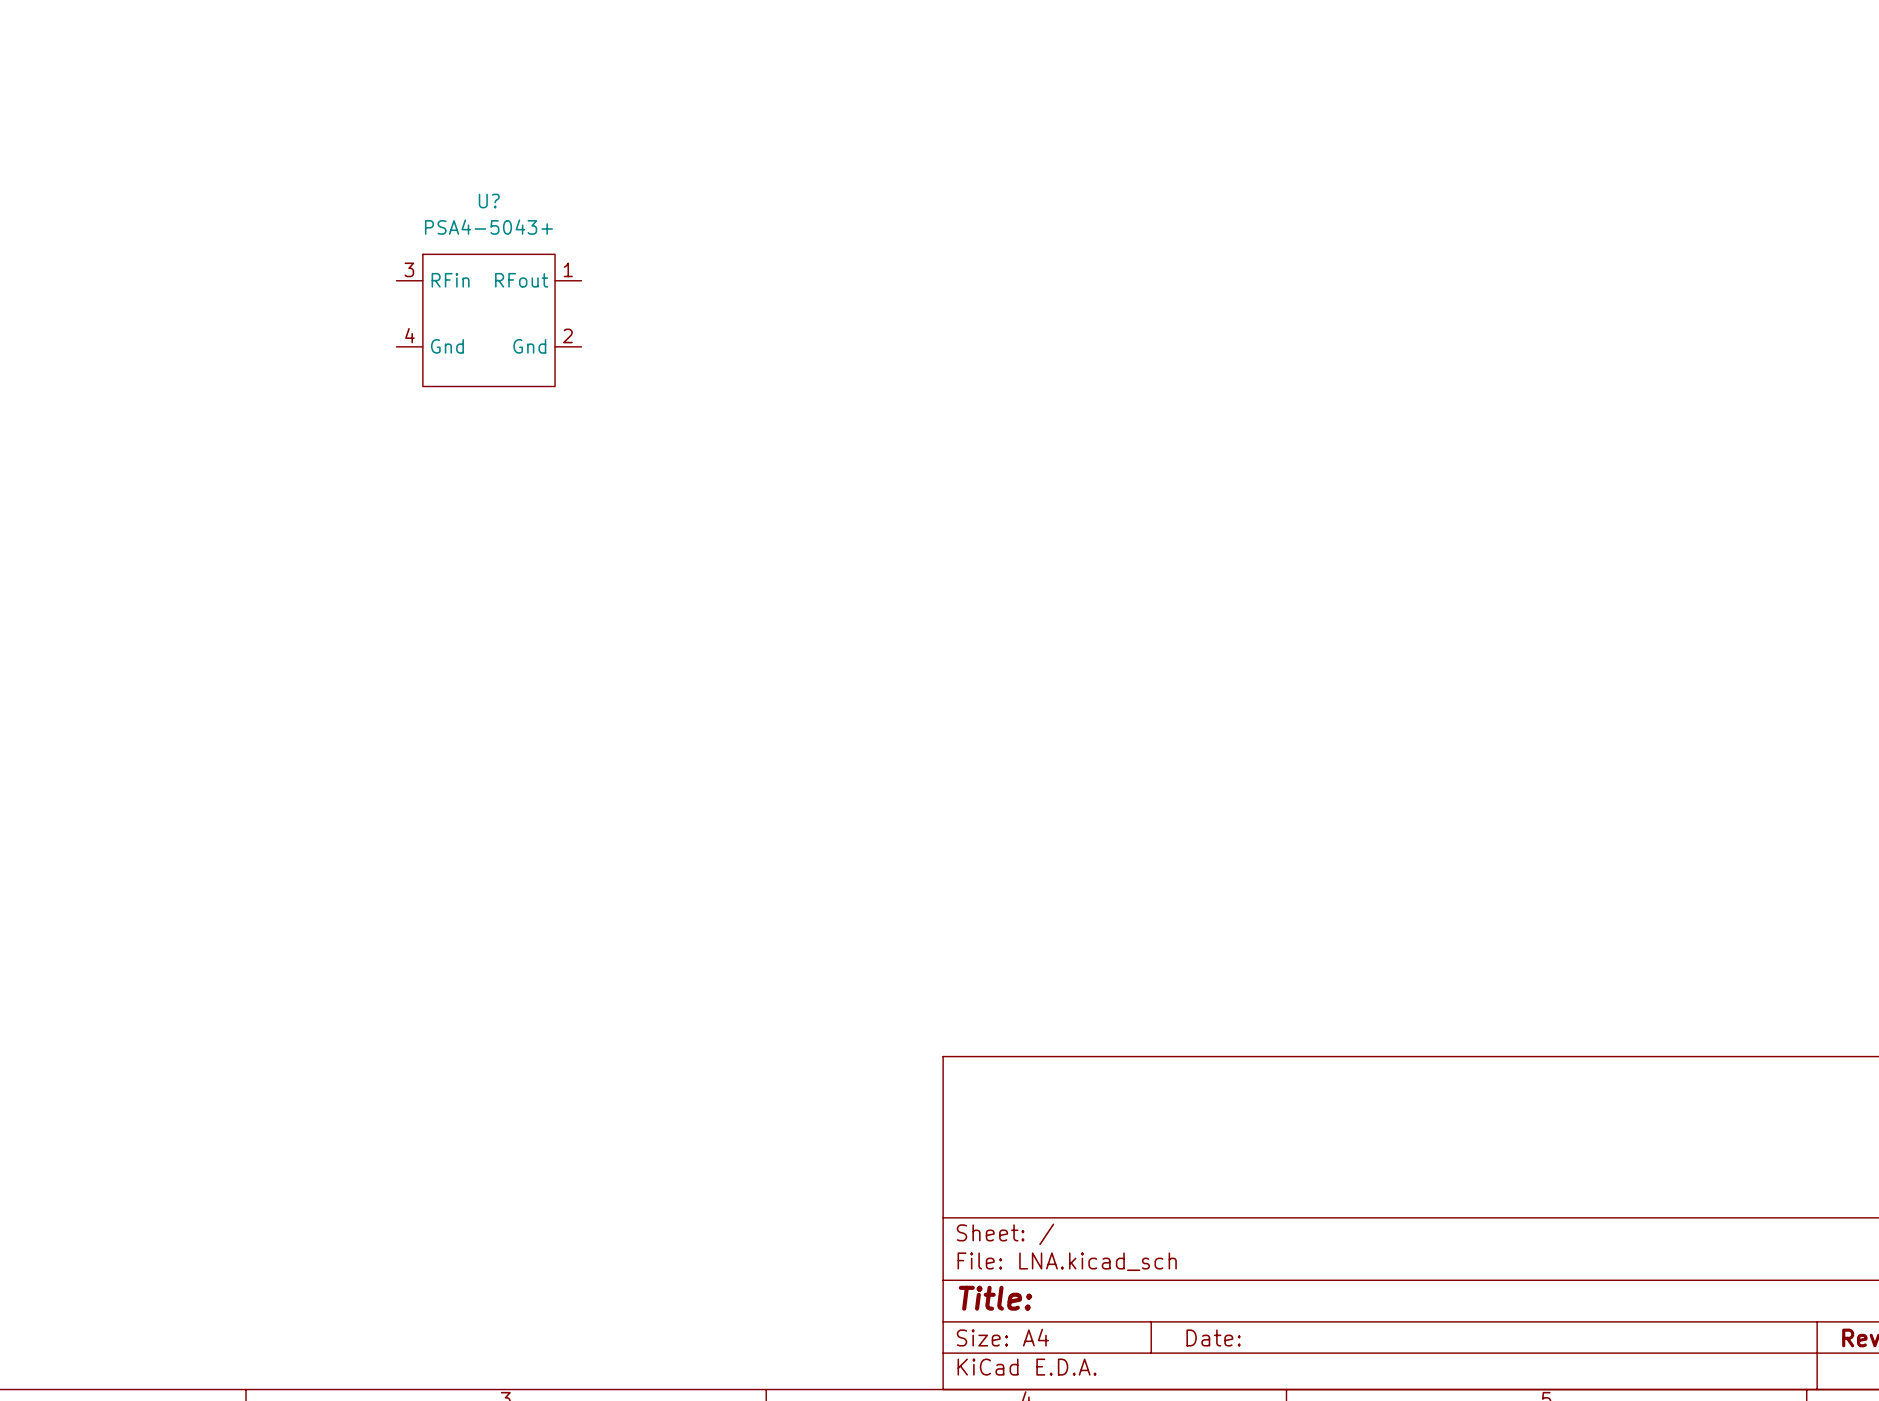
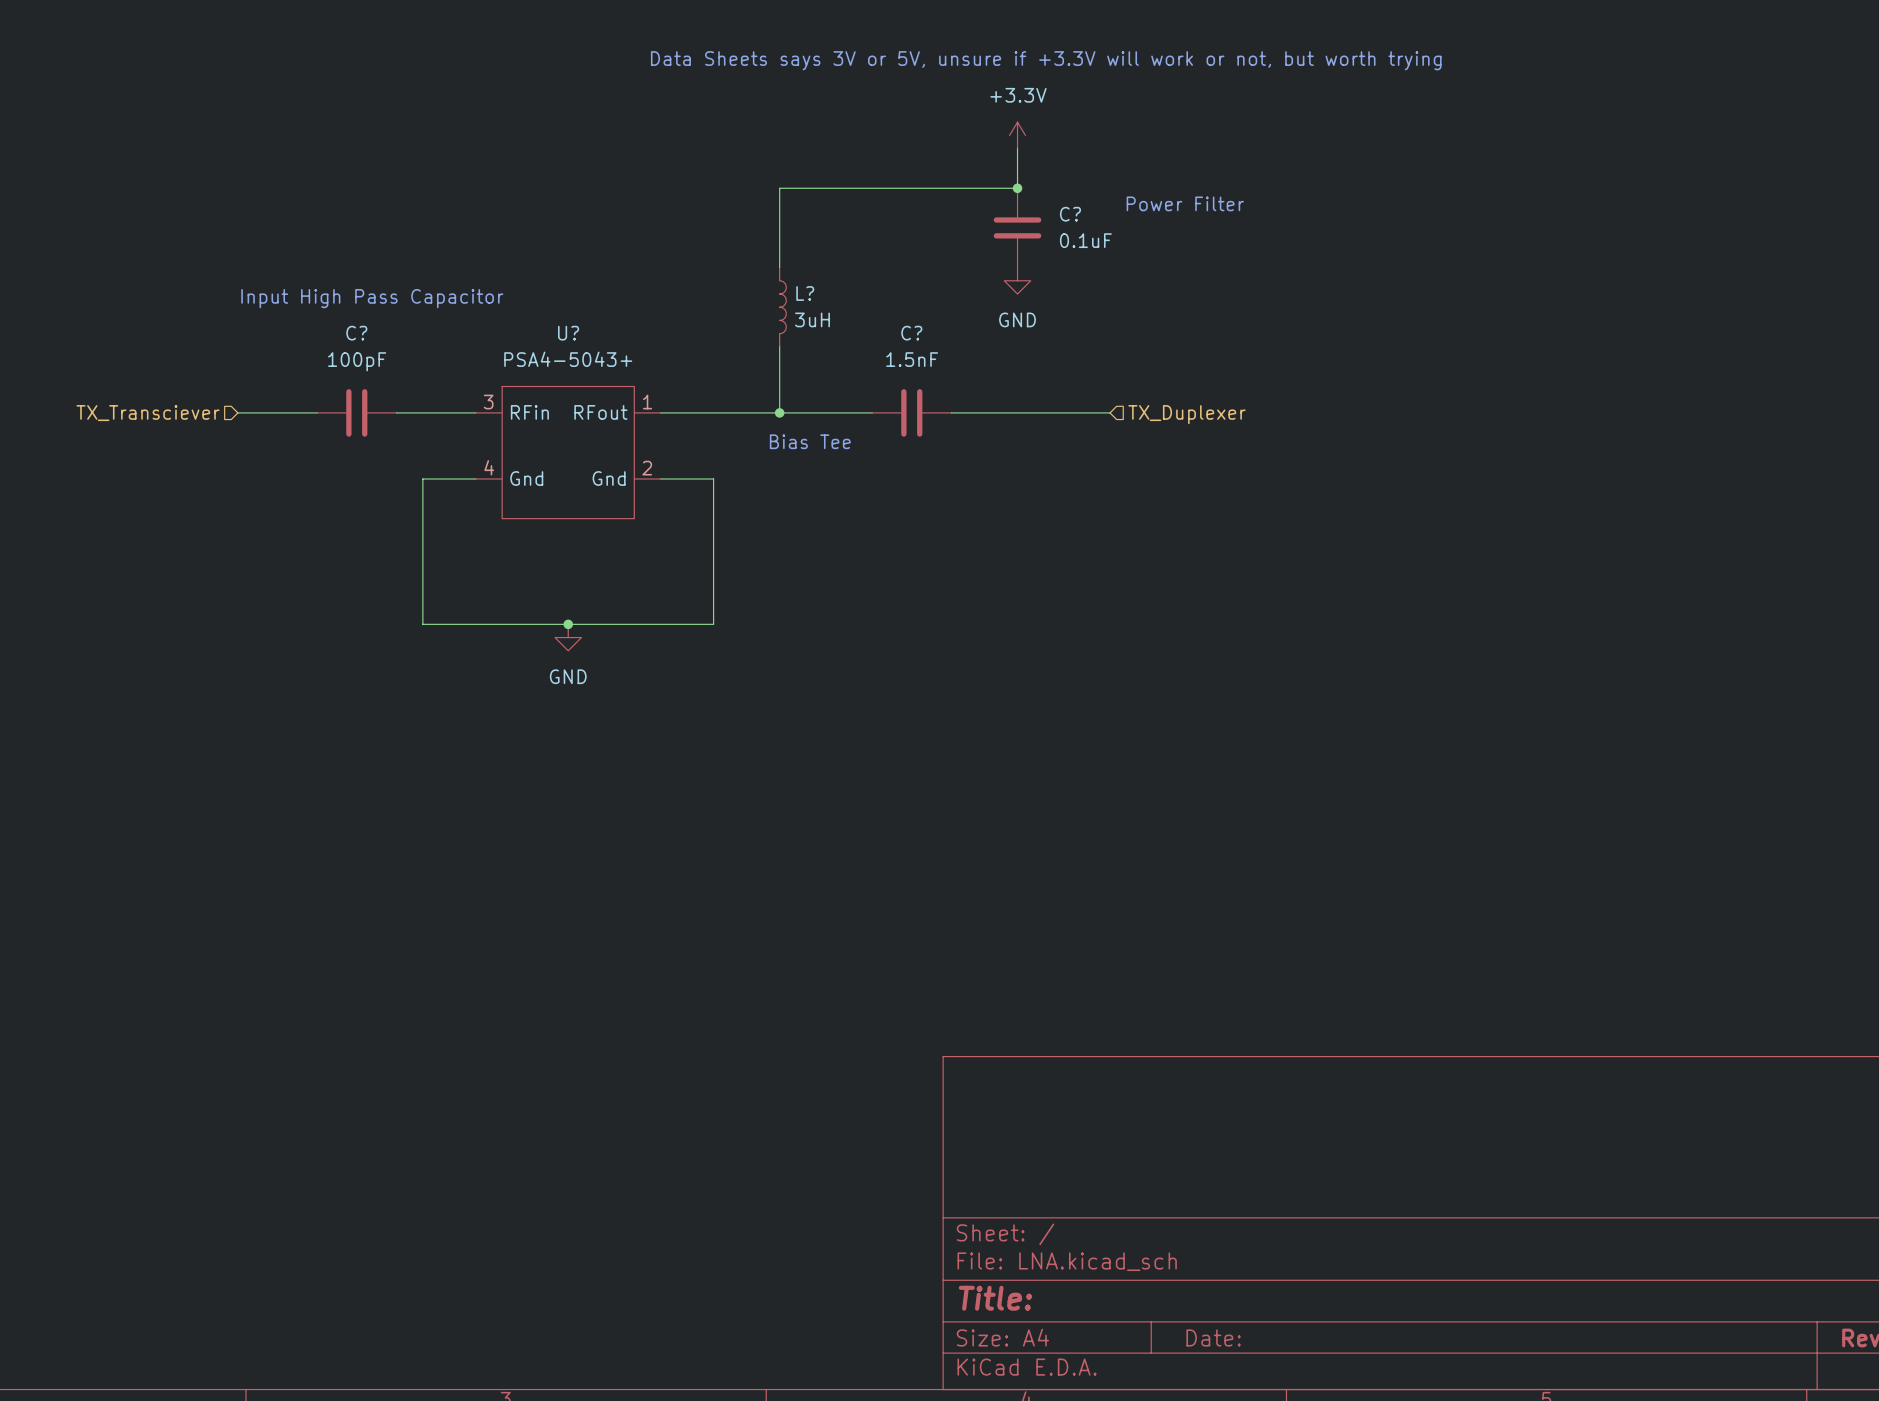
text: none -> Data Sheets says 3V or 5V, unsure if +3.3V will work or not, but worth trying (1046, 60)
power symbol: none -> +3.3V (1017, 135)
wire: none -> (1017, 148) (1017, 188) (779, 188) (779, 267)
junction: none -> (1017, 188)
text: none -> Power Filter (1185, 203)
C?: none -> 0.1uF (1017, 227)
power symbol: none -> GND (1017, 280)
text: none -> Input High Pass Capacitor (372, 298)
L?: none -> 3uH (782, 307)
U? position: (488, 320) -> (568, 452)
wire: none -> (779, 346) (779, 412)
wire: none -> (237, 412) (317, 412)
C?: none -> 100pF (356, 412)
wire: none -> (396, 412) (475, 412)
wire: none -> (660, 412) (872, 412)
junction: none -> (779, 412)
C?: none -> 1.5nF (911, 412)
wire: none -> (951, 412) (1110, 412)
hierarchical label: none -> TX_Transciever (148, 413)
hierarchical label: none -> TX_Duplexer (1186, 414)
text: none -> Bias Tee (810, 441)
wire: none -> (475, 479) (422, 479) (422, 624) (713, 624) (713, 479) (660, 479)
junction: none -> (568, 624)
power symbol: none -> GND (568, 637)

